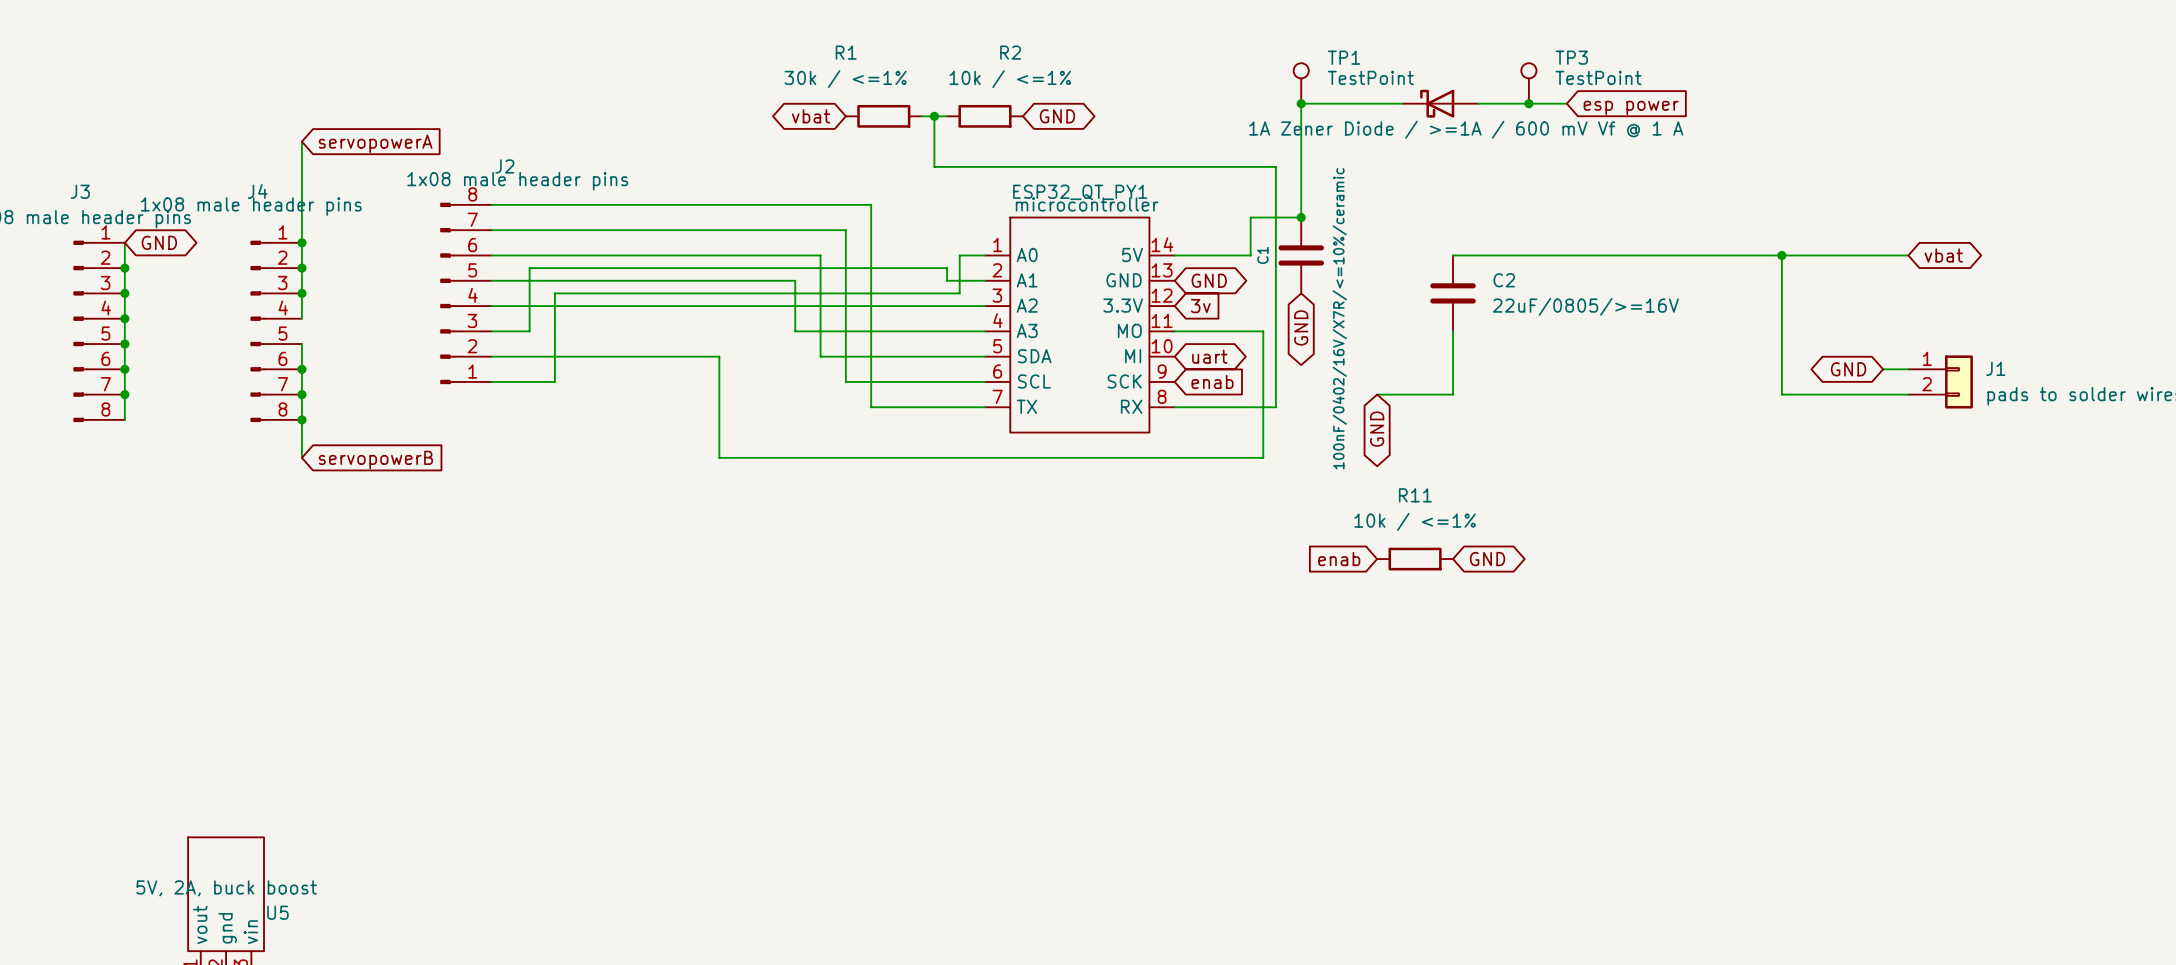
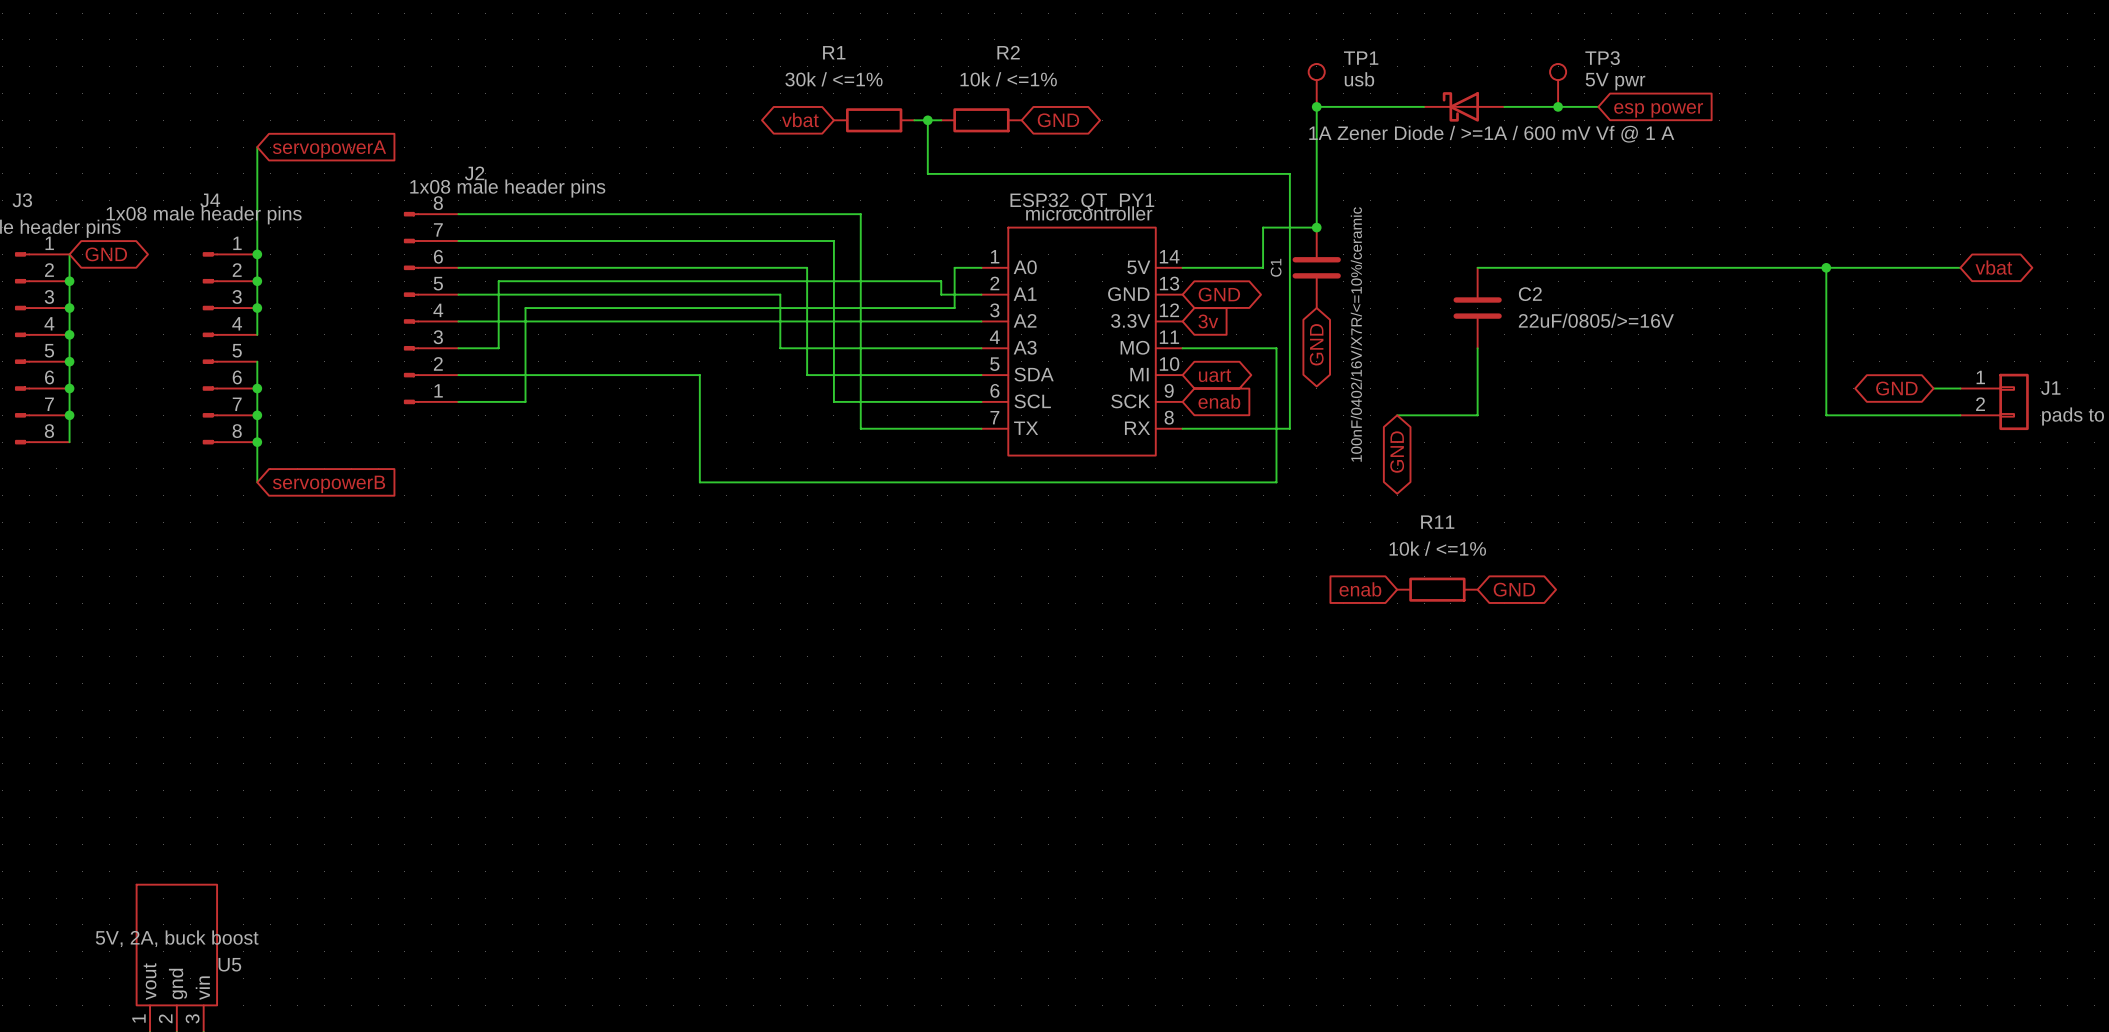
TP1 value: TestPoint (1370, 77) -> usb (1359, 79)
TP3 value: TestPoint (1598, 77) -> 5V pwr (1615, 81)

